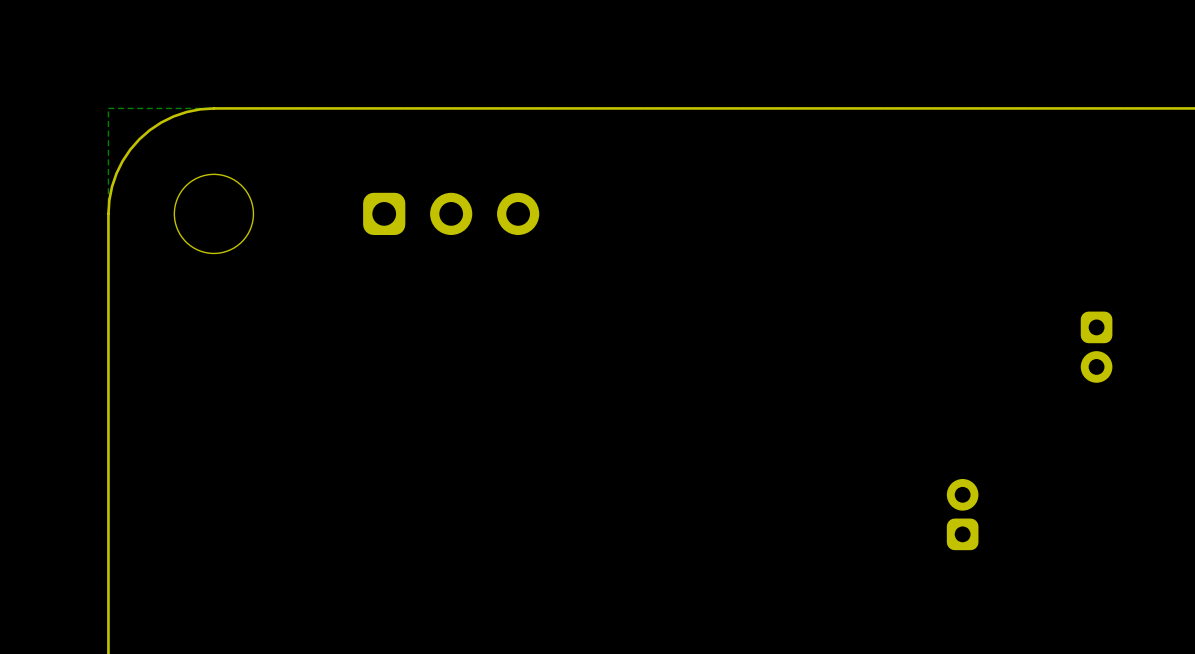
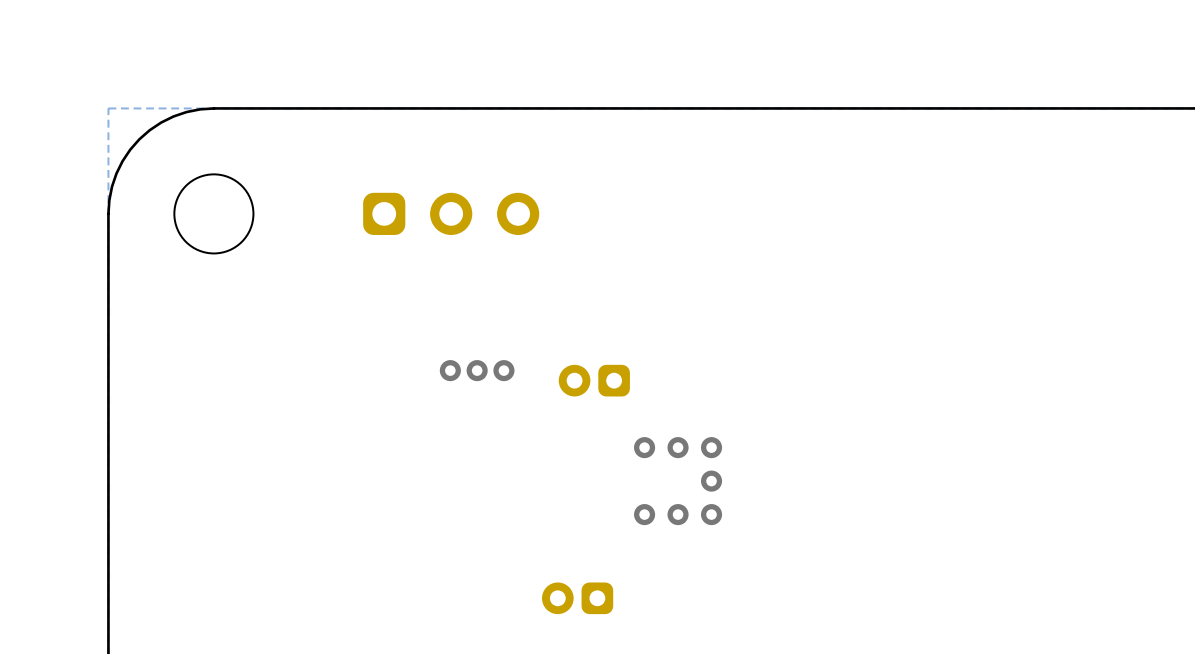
part: (1096, 347) -> none
via: none -> (450, 370)
via: none -> (477, 370)
via: none -> (503, 370)
part: none -> (594, 380)
via: none -> (644, 447)
via: none -> (678, 447)
via: none -> (711, 447)
via: none -> (711, 481)
via: none -> (644, 514)
via: none -> (678, 514)
via: none -> (711, 514)
part: (962, 514) -> none
part: none -> (577, 598)

